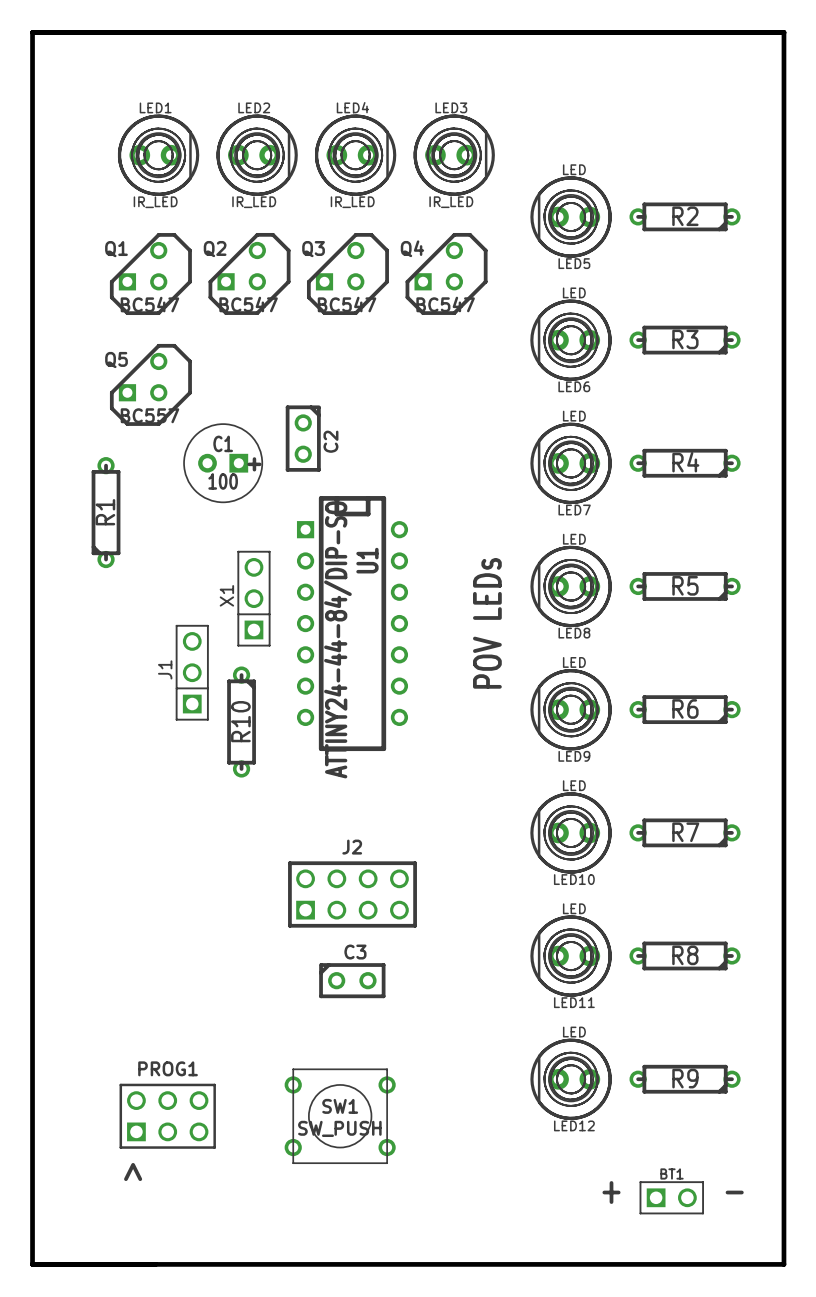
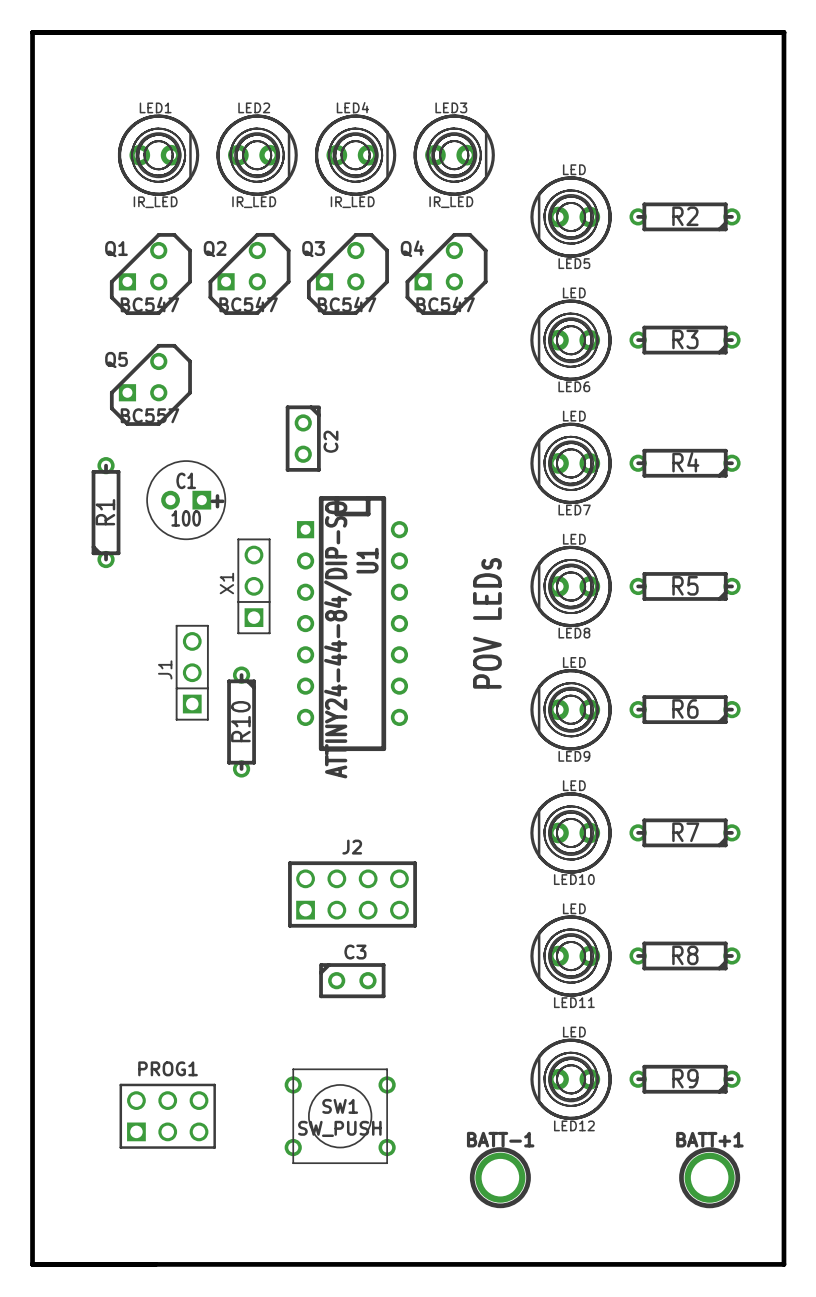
C1 position: (223, 463) -> (186, 500)
X1 position: (253, 598) -> (253, 586)
text: > (133, 1172) -> none
BATT-1: none -> (500, 1177)
BATT+1: none -> (709, 1177)
text: + (611, 1192) -> none
text: - (734, 1192) -> none
BT1: (671, 1197) -> none

